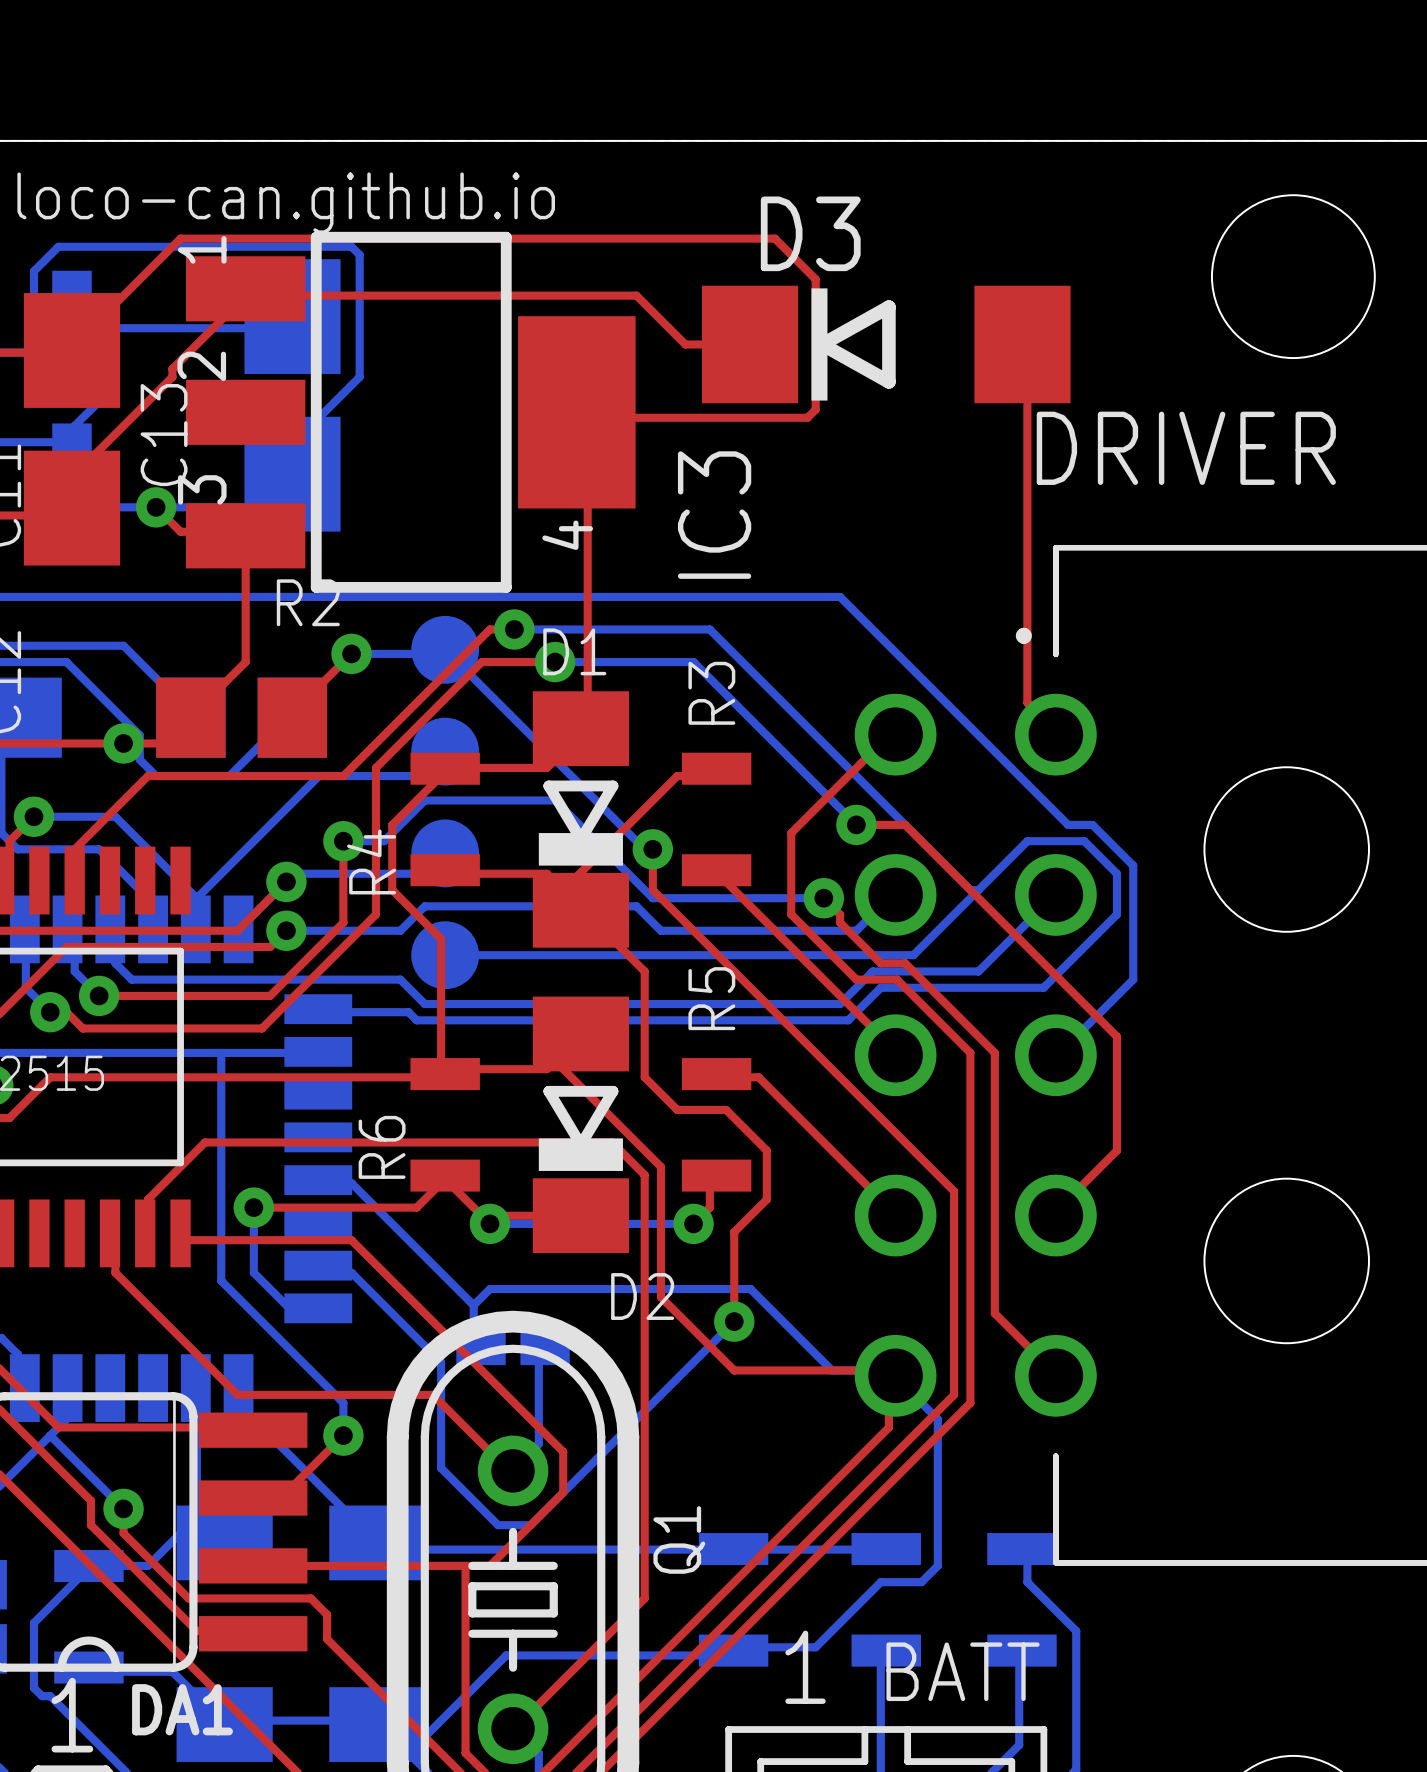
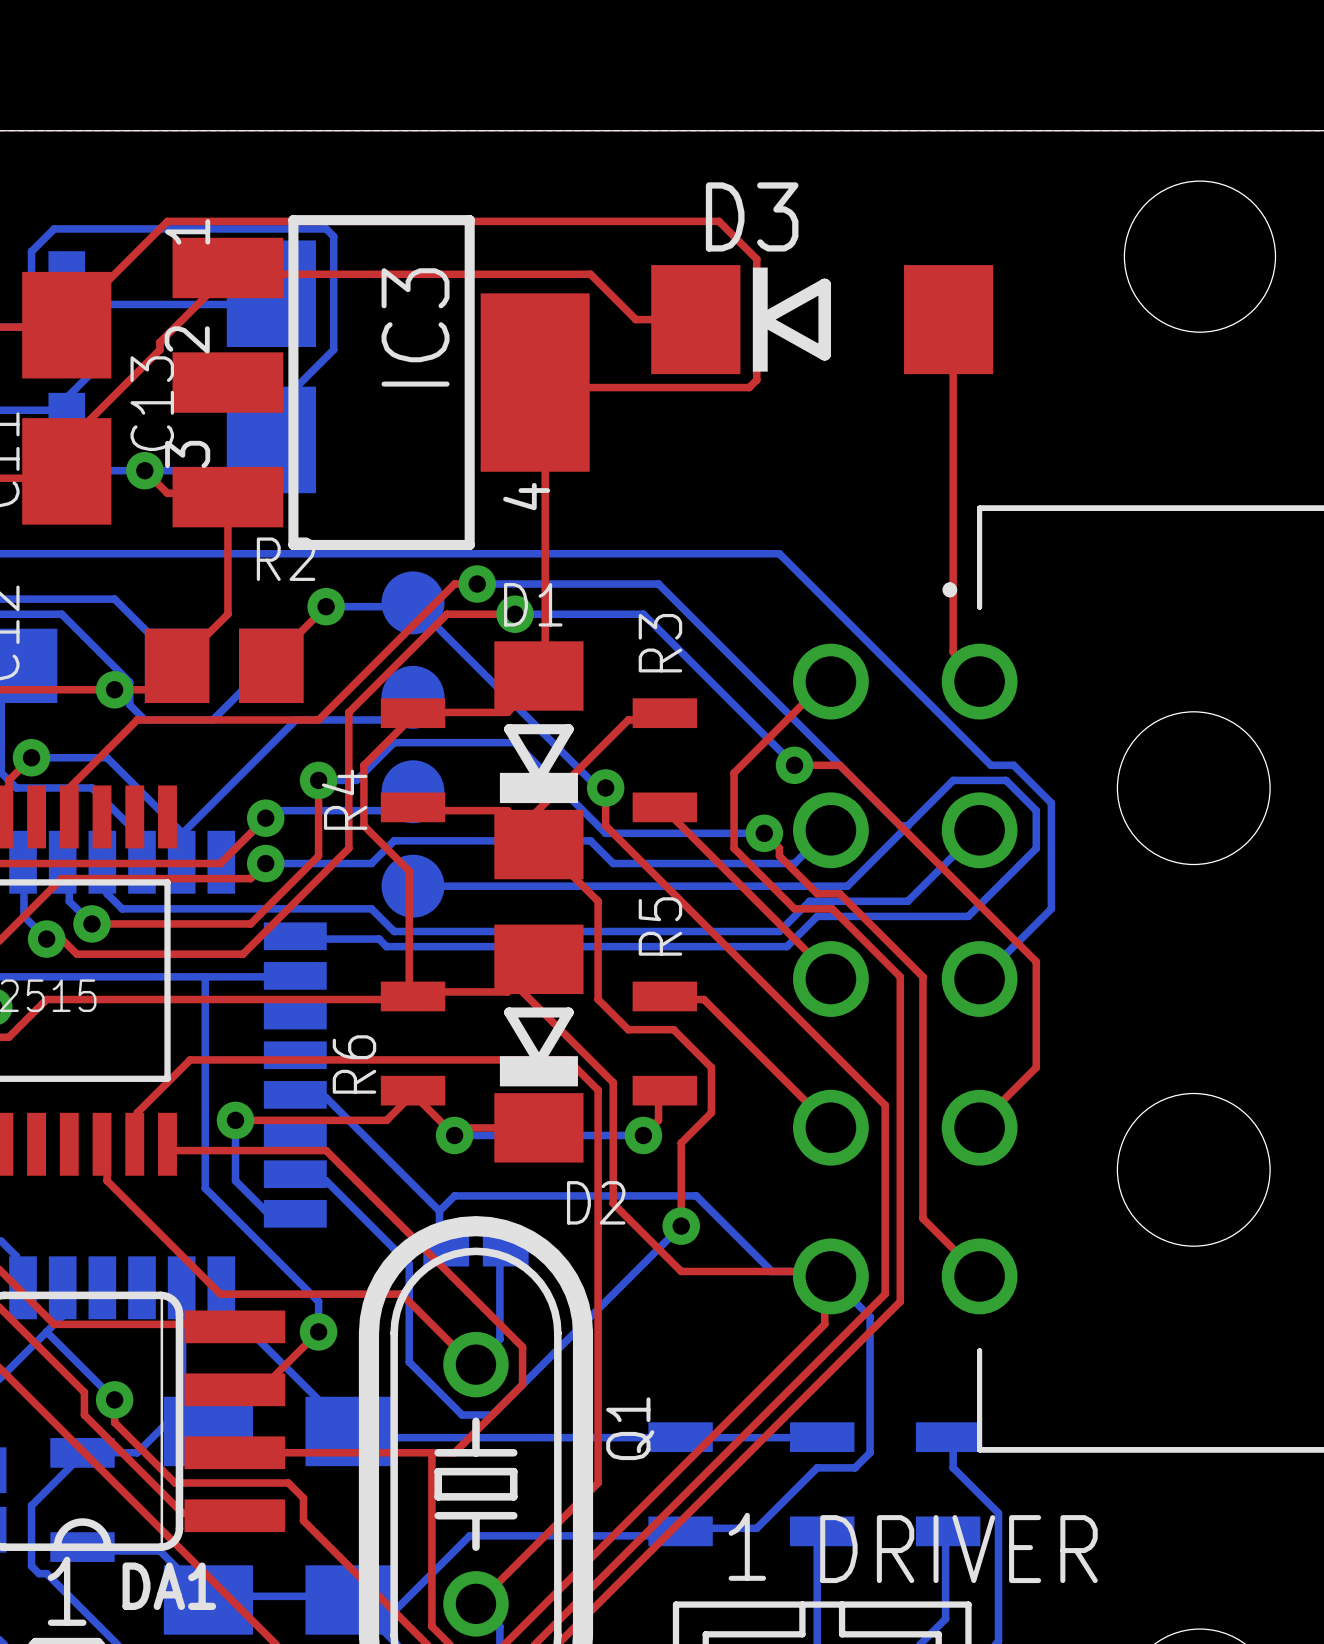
text: loco-can.github.io (286, 203) -> none
DRIVER name position: DRIVER (1186, 448) -> DRIVER (958, 1549)
IC3 name position: IC3 (714, 515) -> IC3 (415, 327)
text: BATT (963, 1671) -> none

